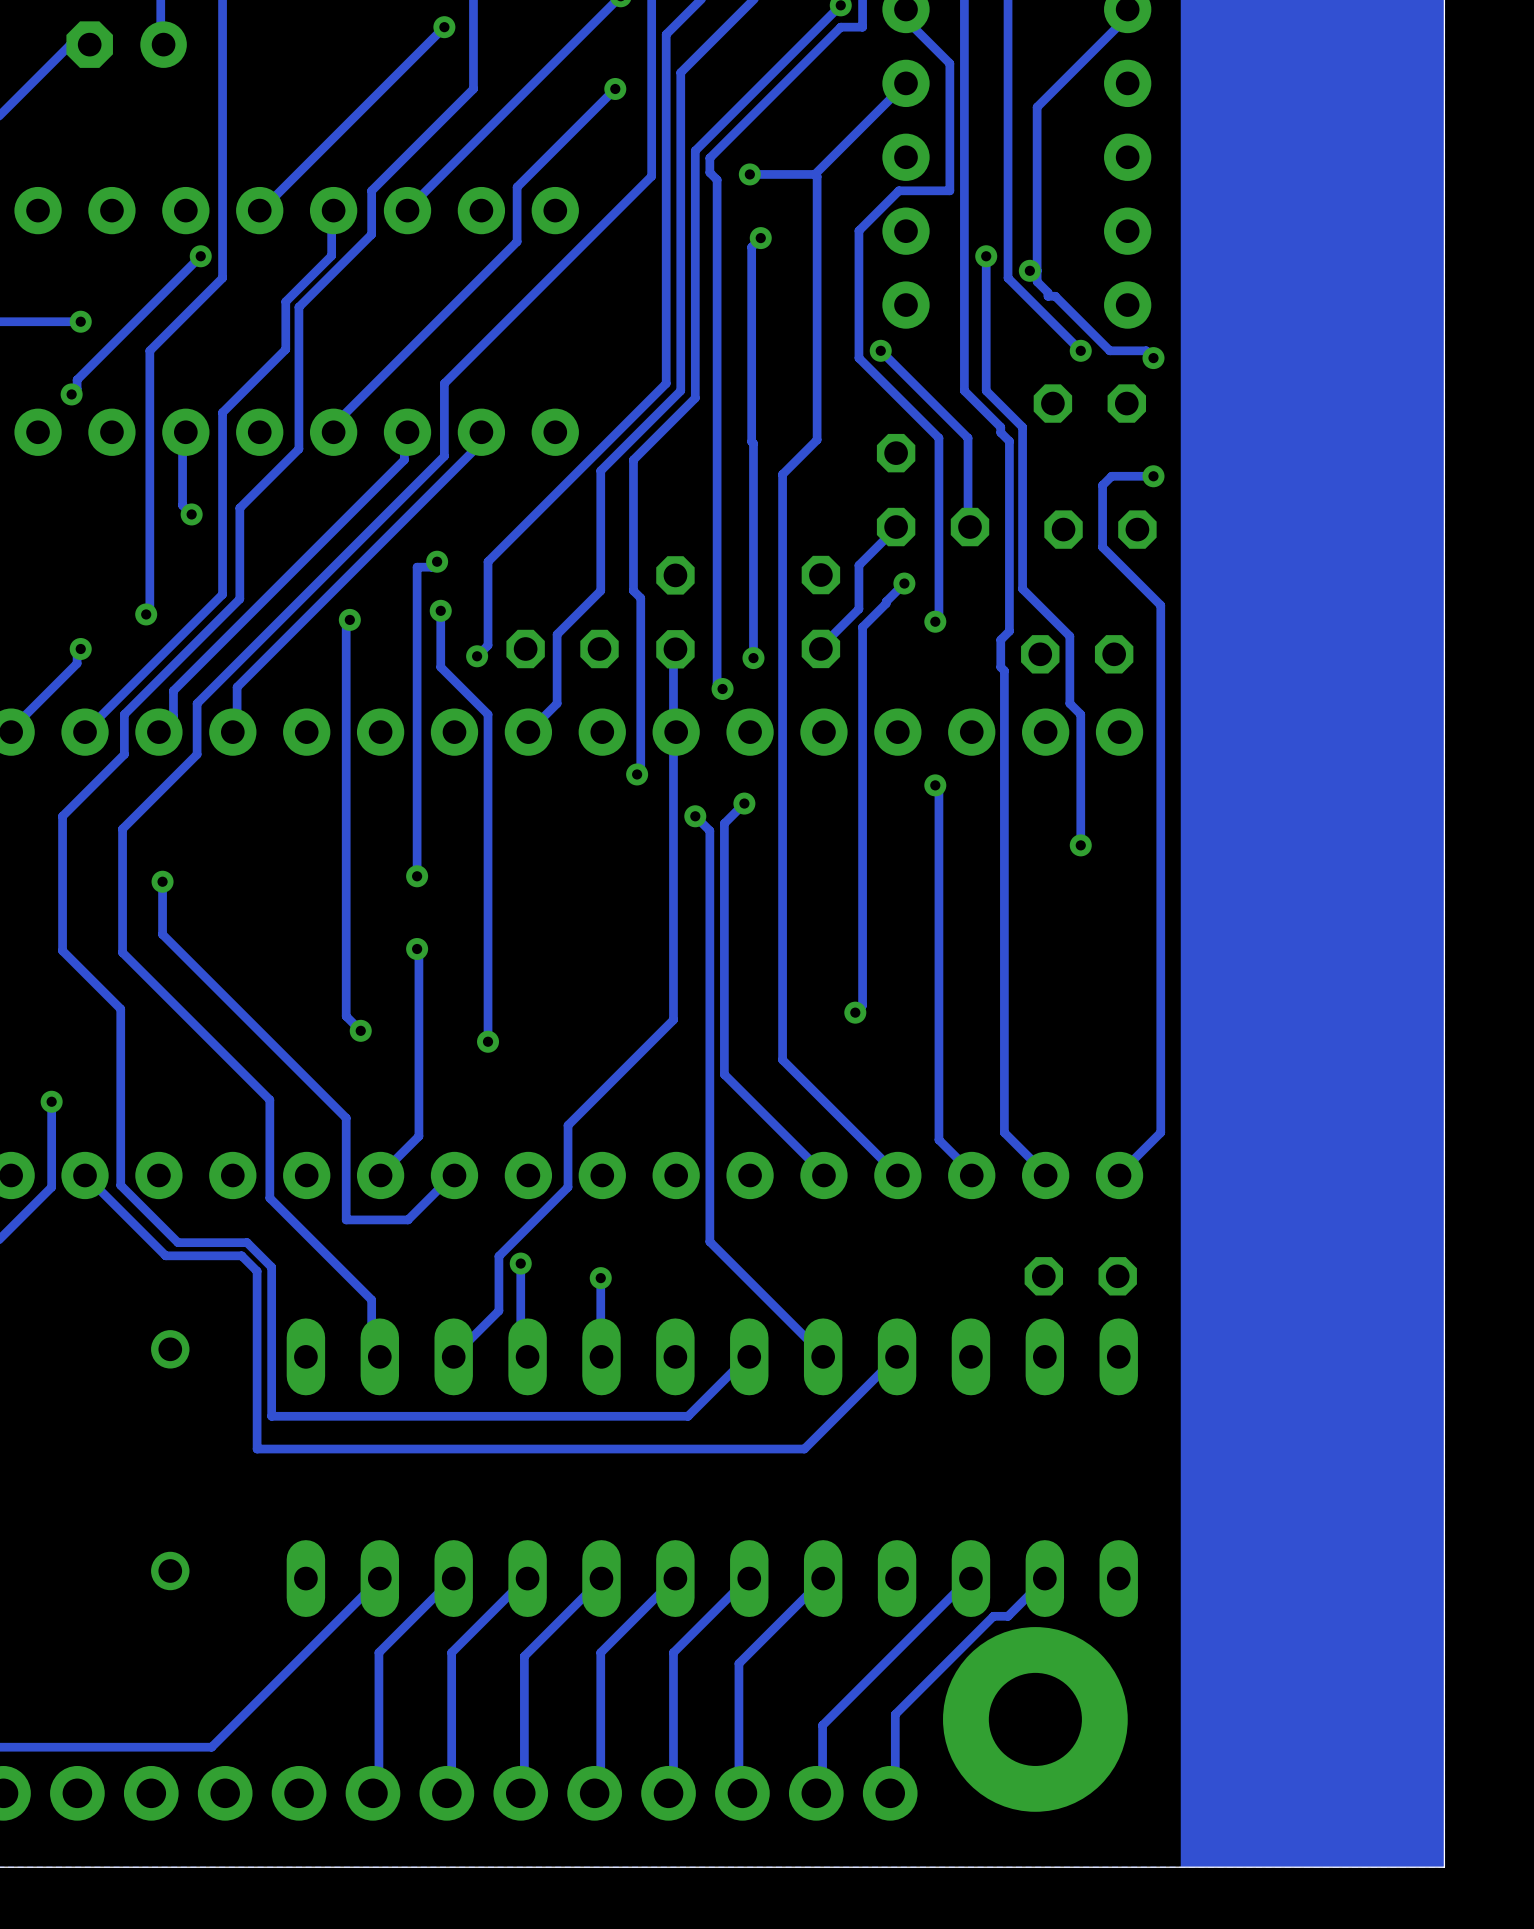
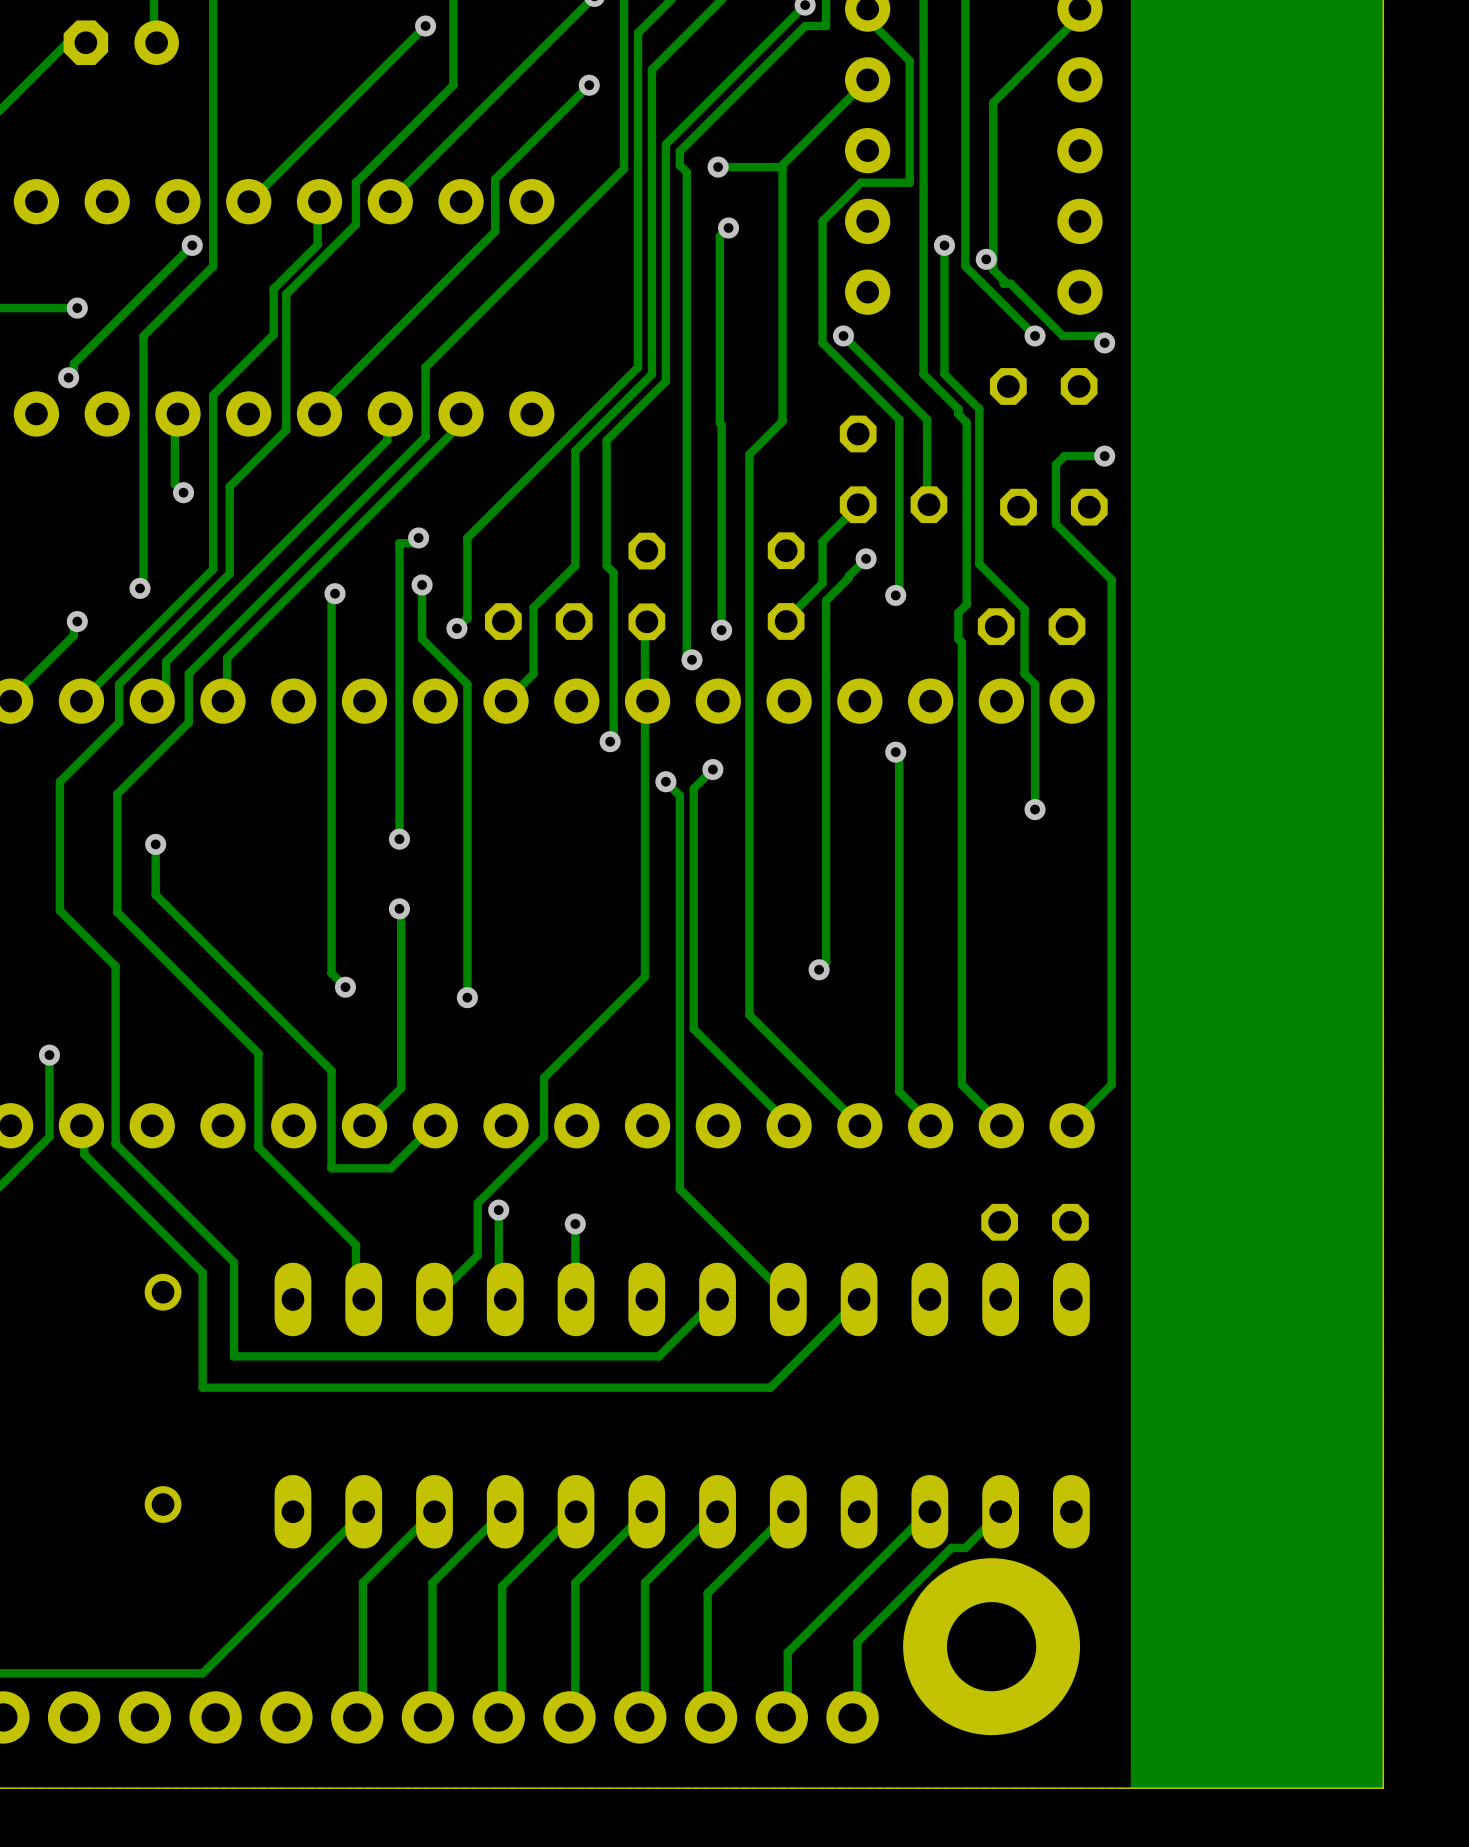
track: (88, 1178) (165, 1255) (241, 1255) (257, 1271) (257, 1449) -> (84, 1128) (84, 1154) (202, 1272) (202, 1387) (246, 1387)
track: (120, 1185) (178, 1242) (247, 1242) (271, 1267) (271, 1416) -> (115, 1135) (115, 1143) (234, 1262) (234, 1356) (260, 1356)

